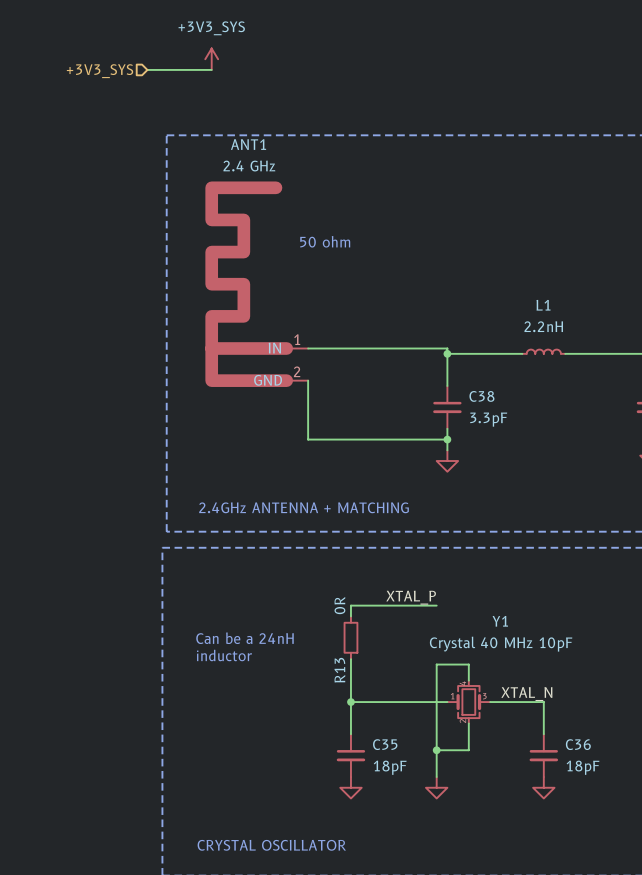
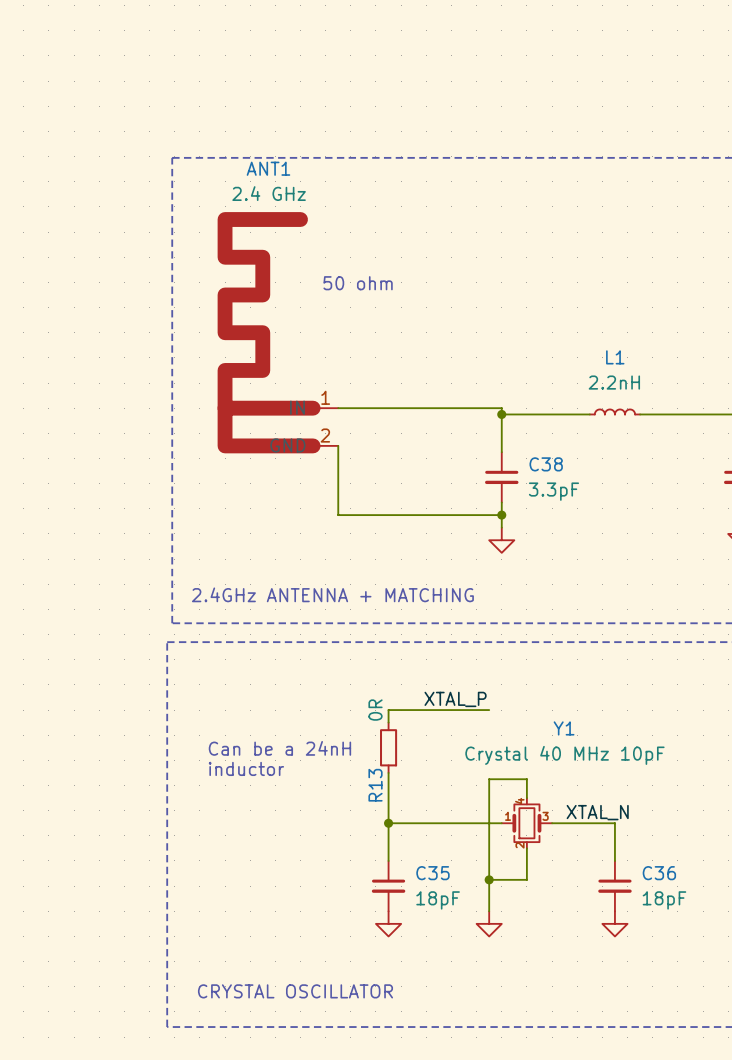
power symbol: +3V3_SYS (211, 59) -> none
wire: (147, 69) (211, 69) -> none
hierarchical label: +3V3_SYS (100, 71) -> none

